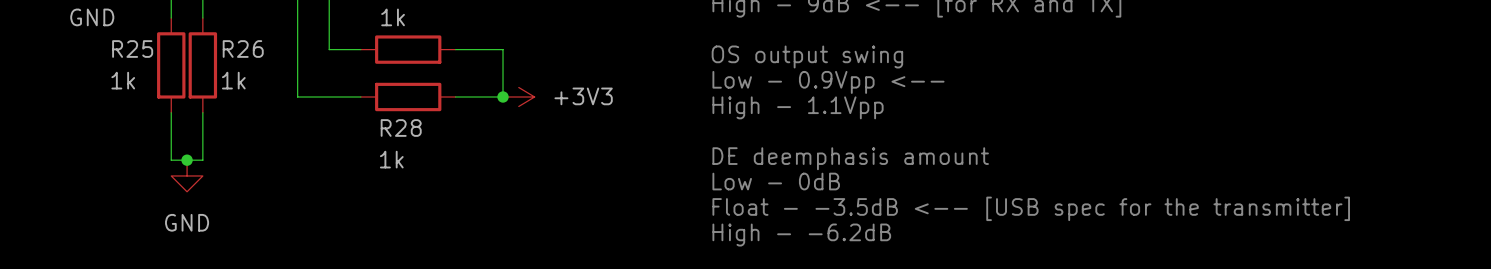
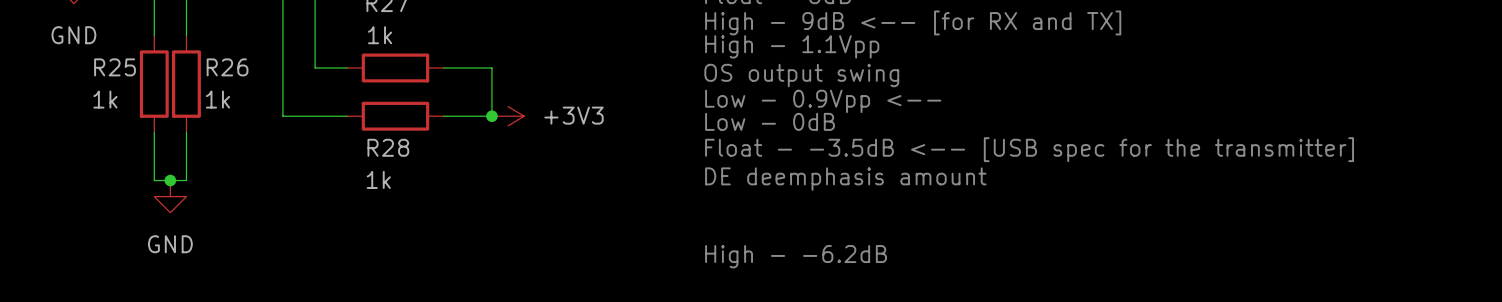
text position: High - 1.1Vpp (798, 107) -> High - 1.1Vpp (792, 46)
text position: Low - 0dB (776, 181) -> Low - 0dB (770, 121)
text position: Float - -3.5dB <-- [USB spec for the transmitter] (1031, 208) -> Float - -3.5dB <-- [USB spec for the transmitter] (1029, 149)

